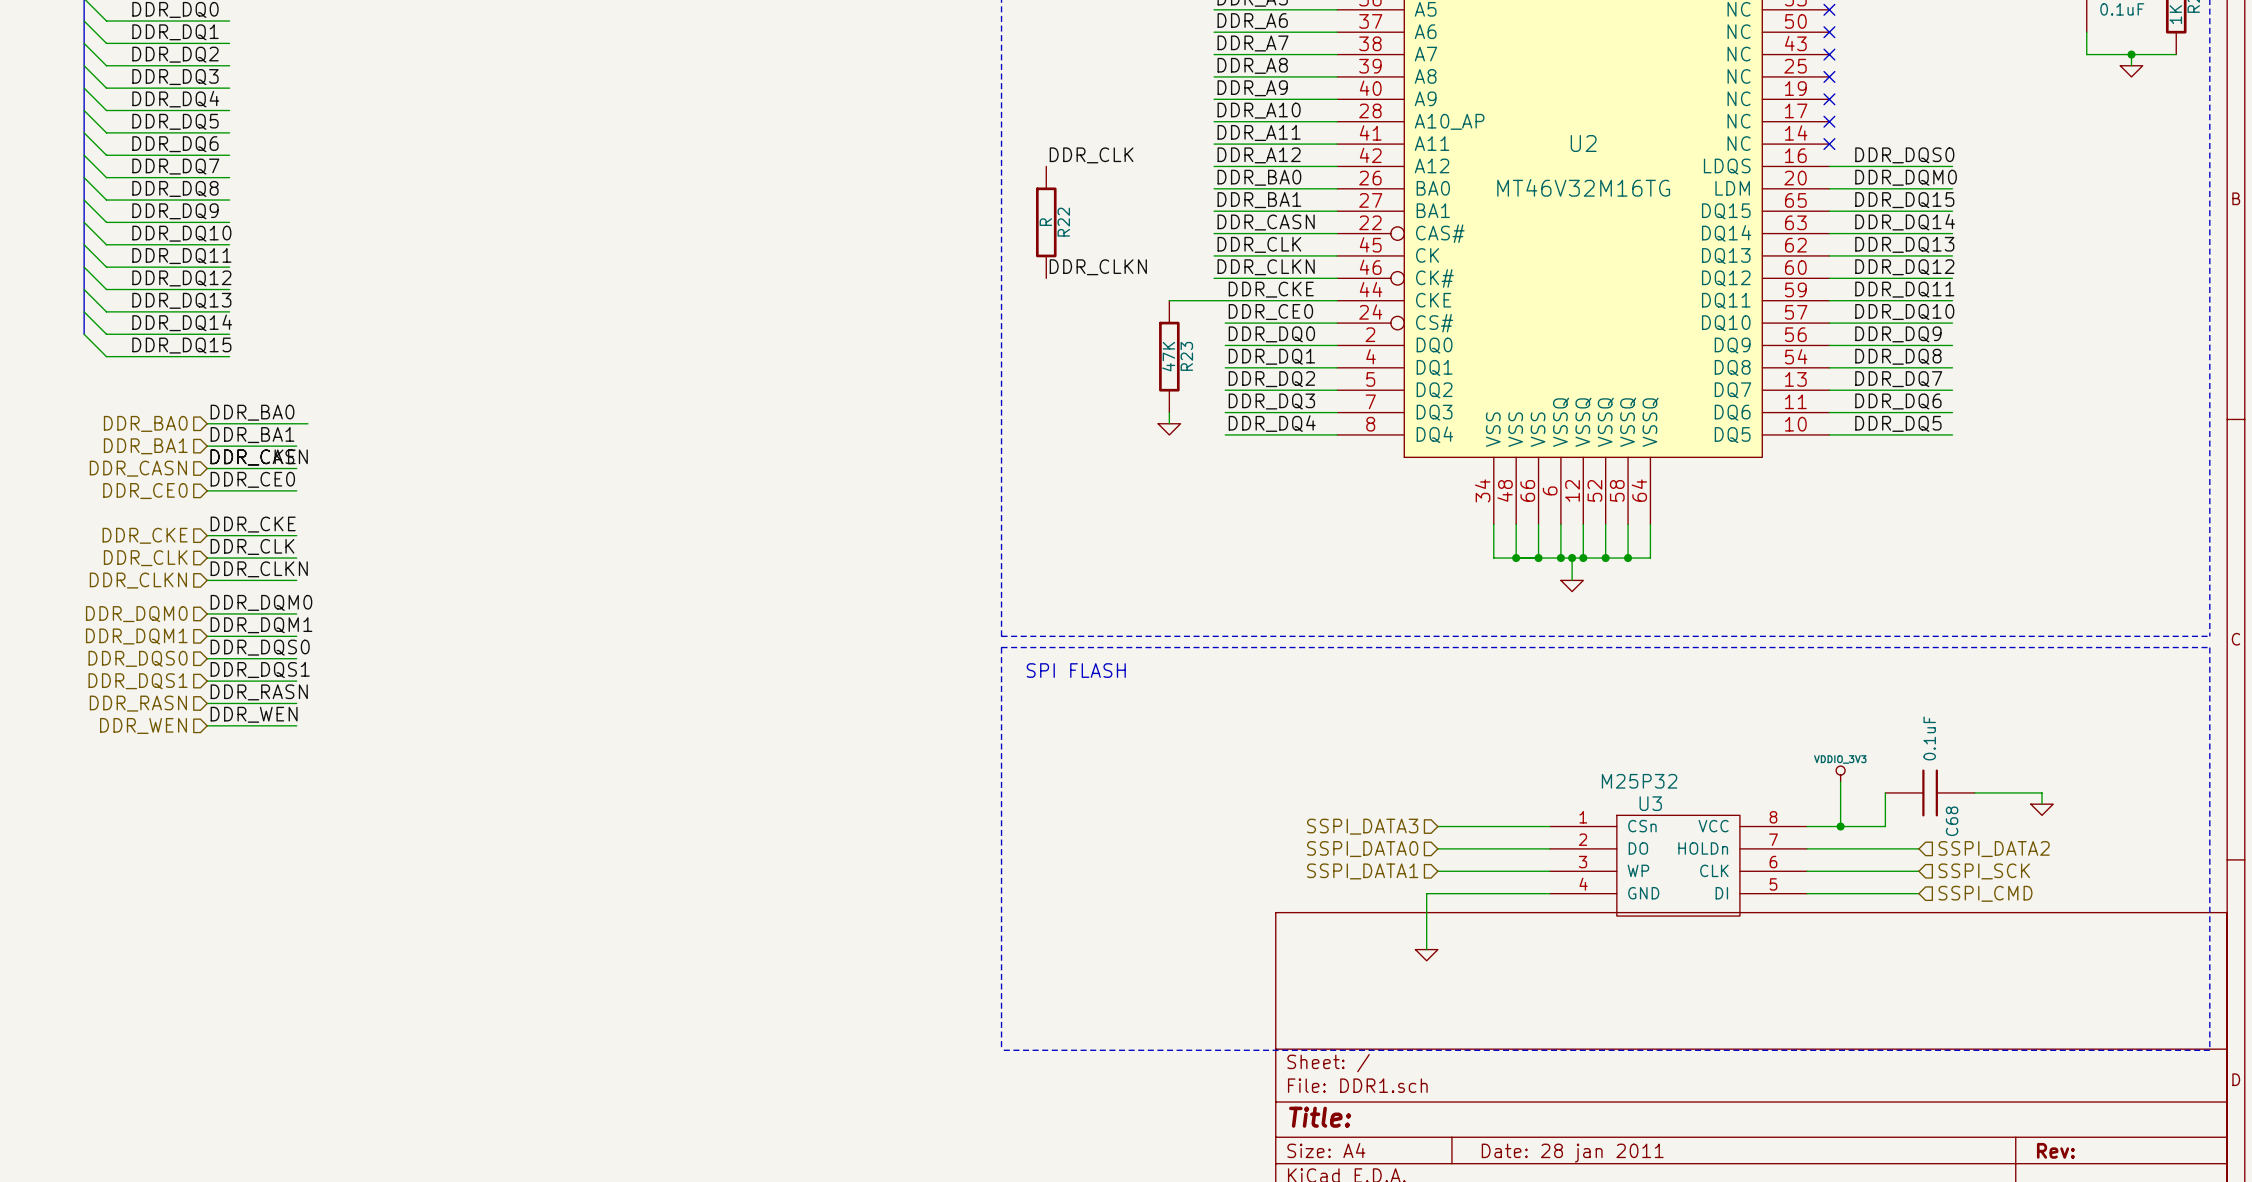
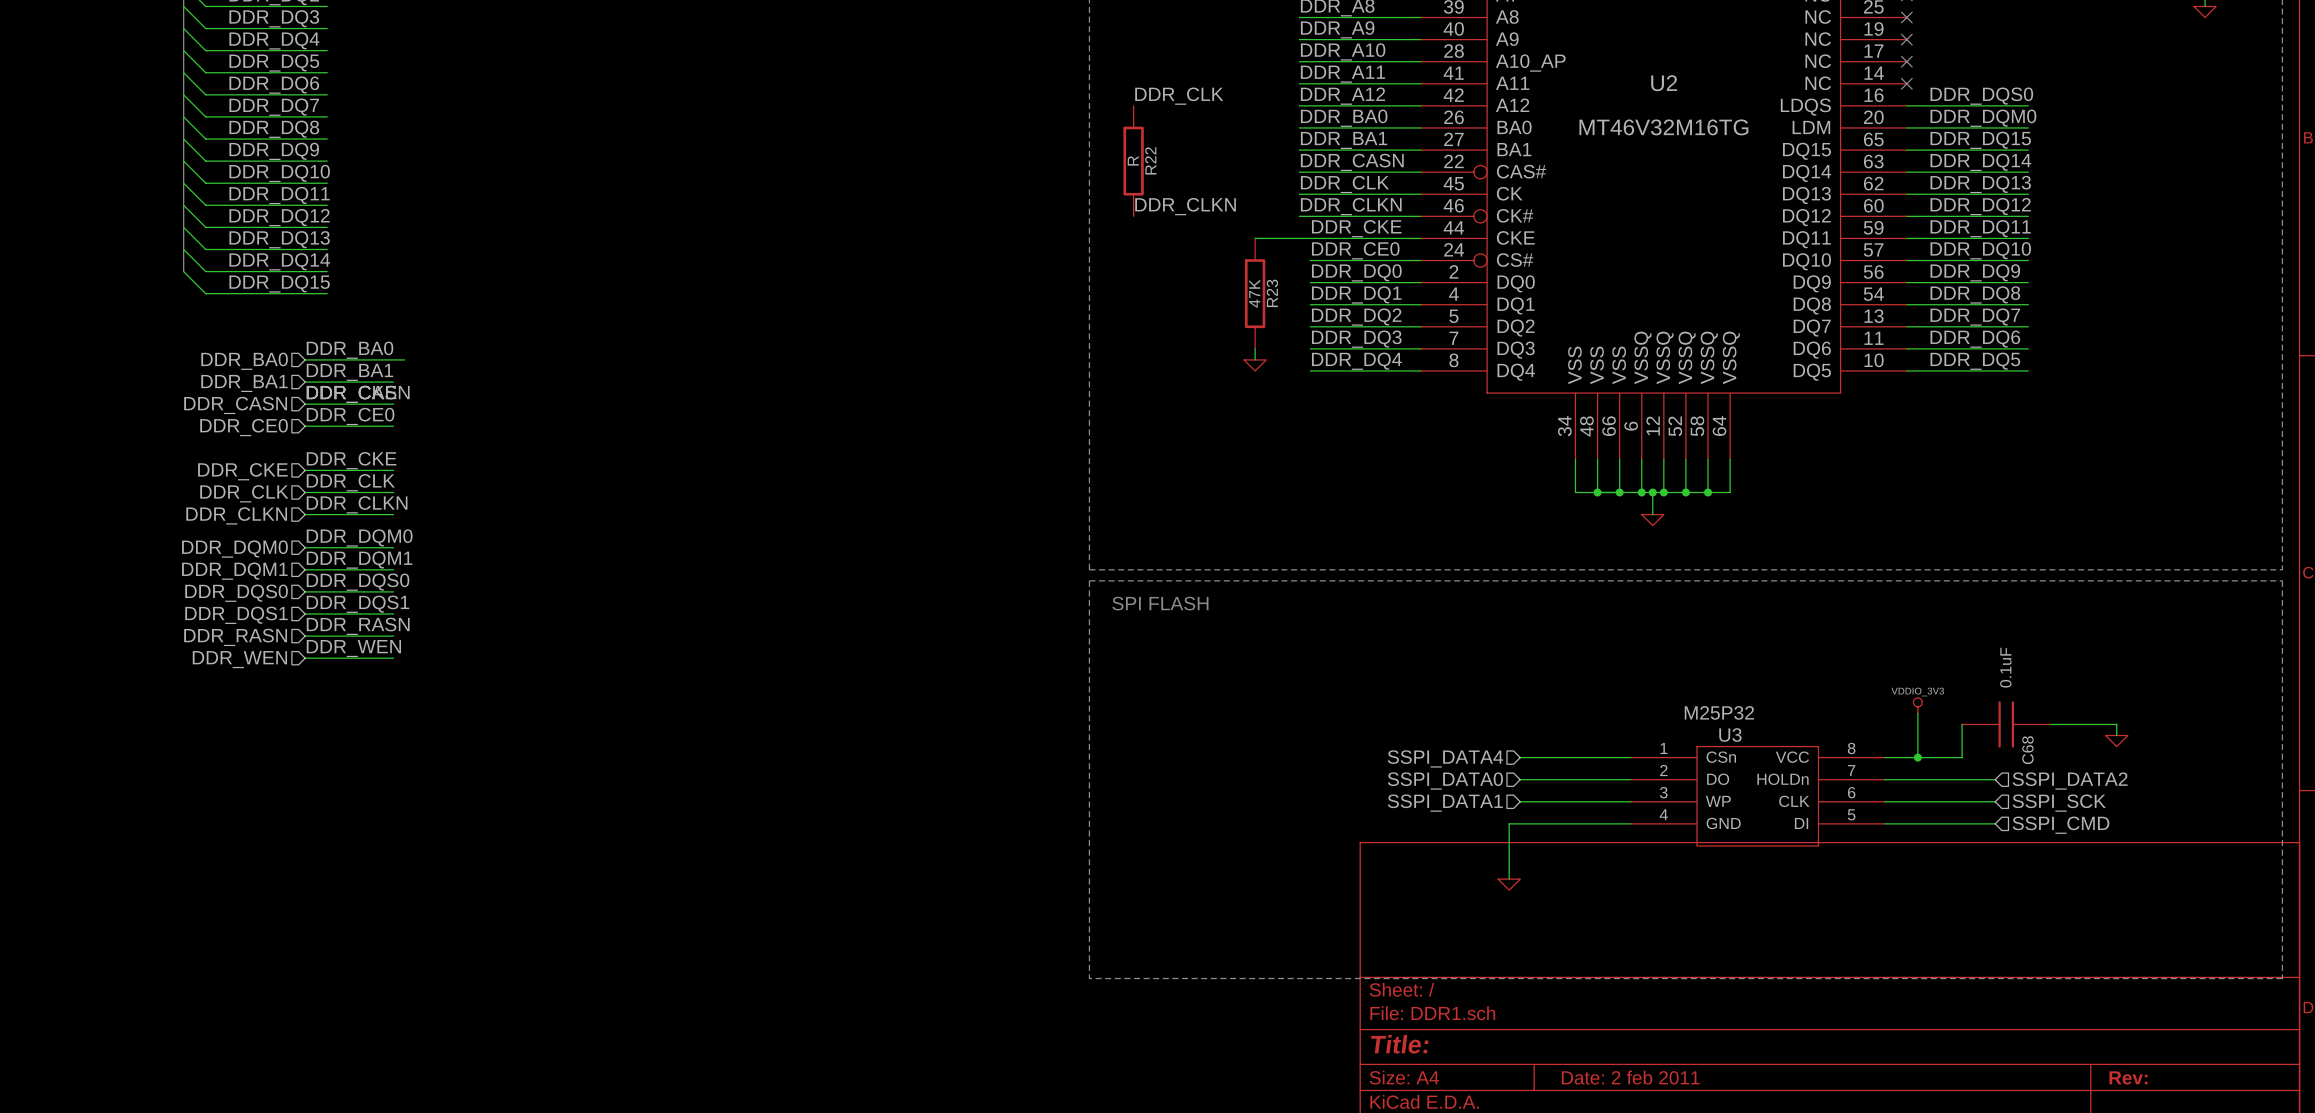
hierarchical label: SSPI_DATA3 (1362, 826) -> SSPI_DATA4 (1445, 758)
title block: Date: 28 jan 2011 (1572, 1153) -> Date: 2 feb 2011 (1630, 1077)

